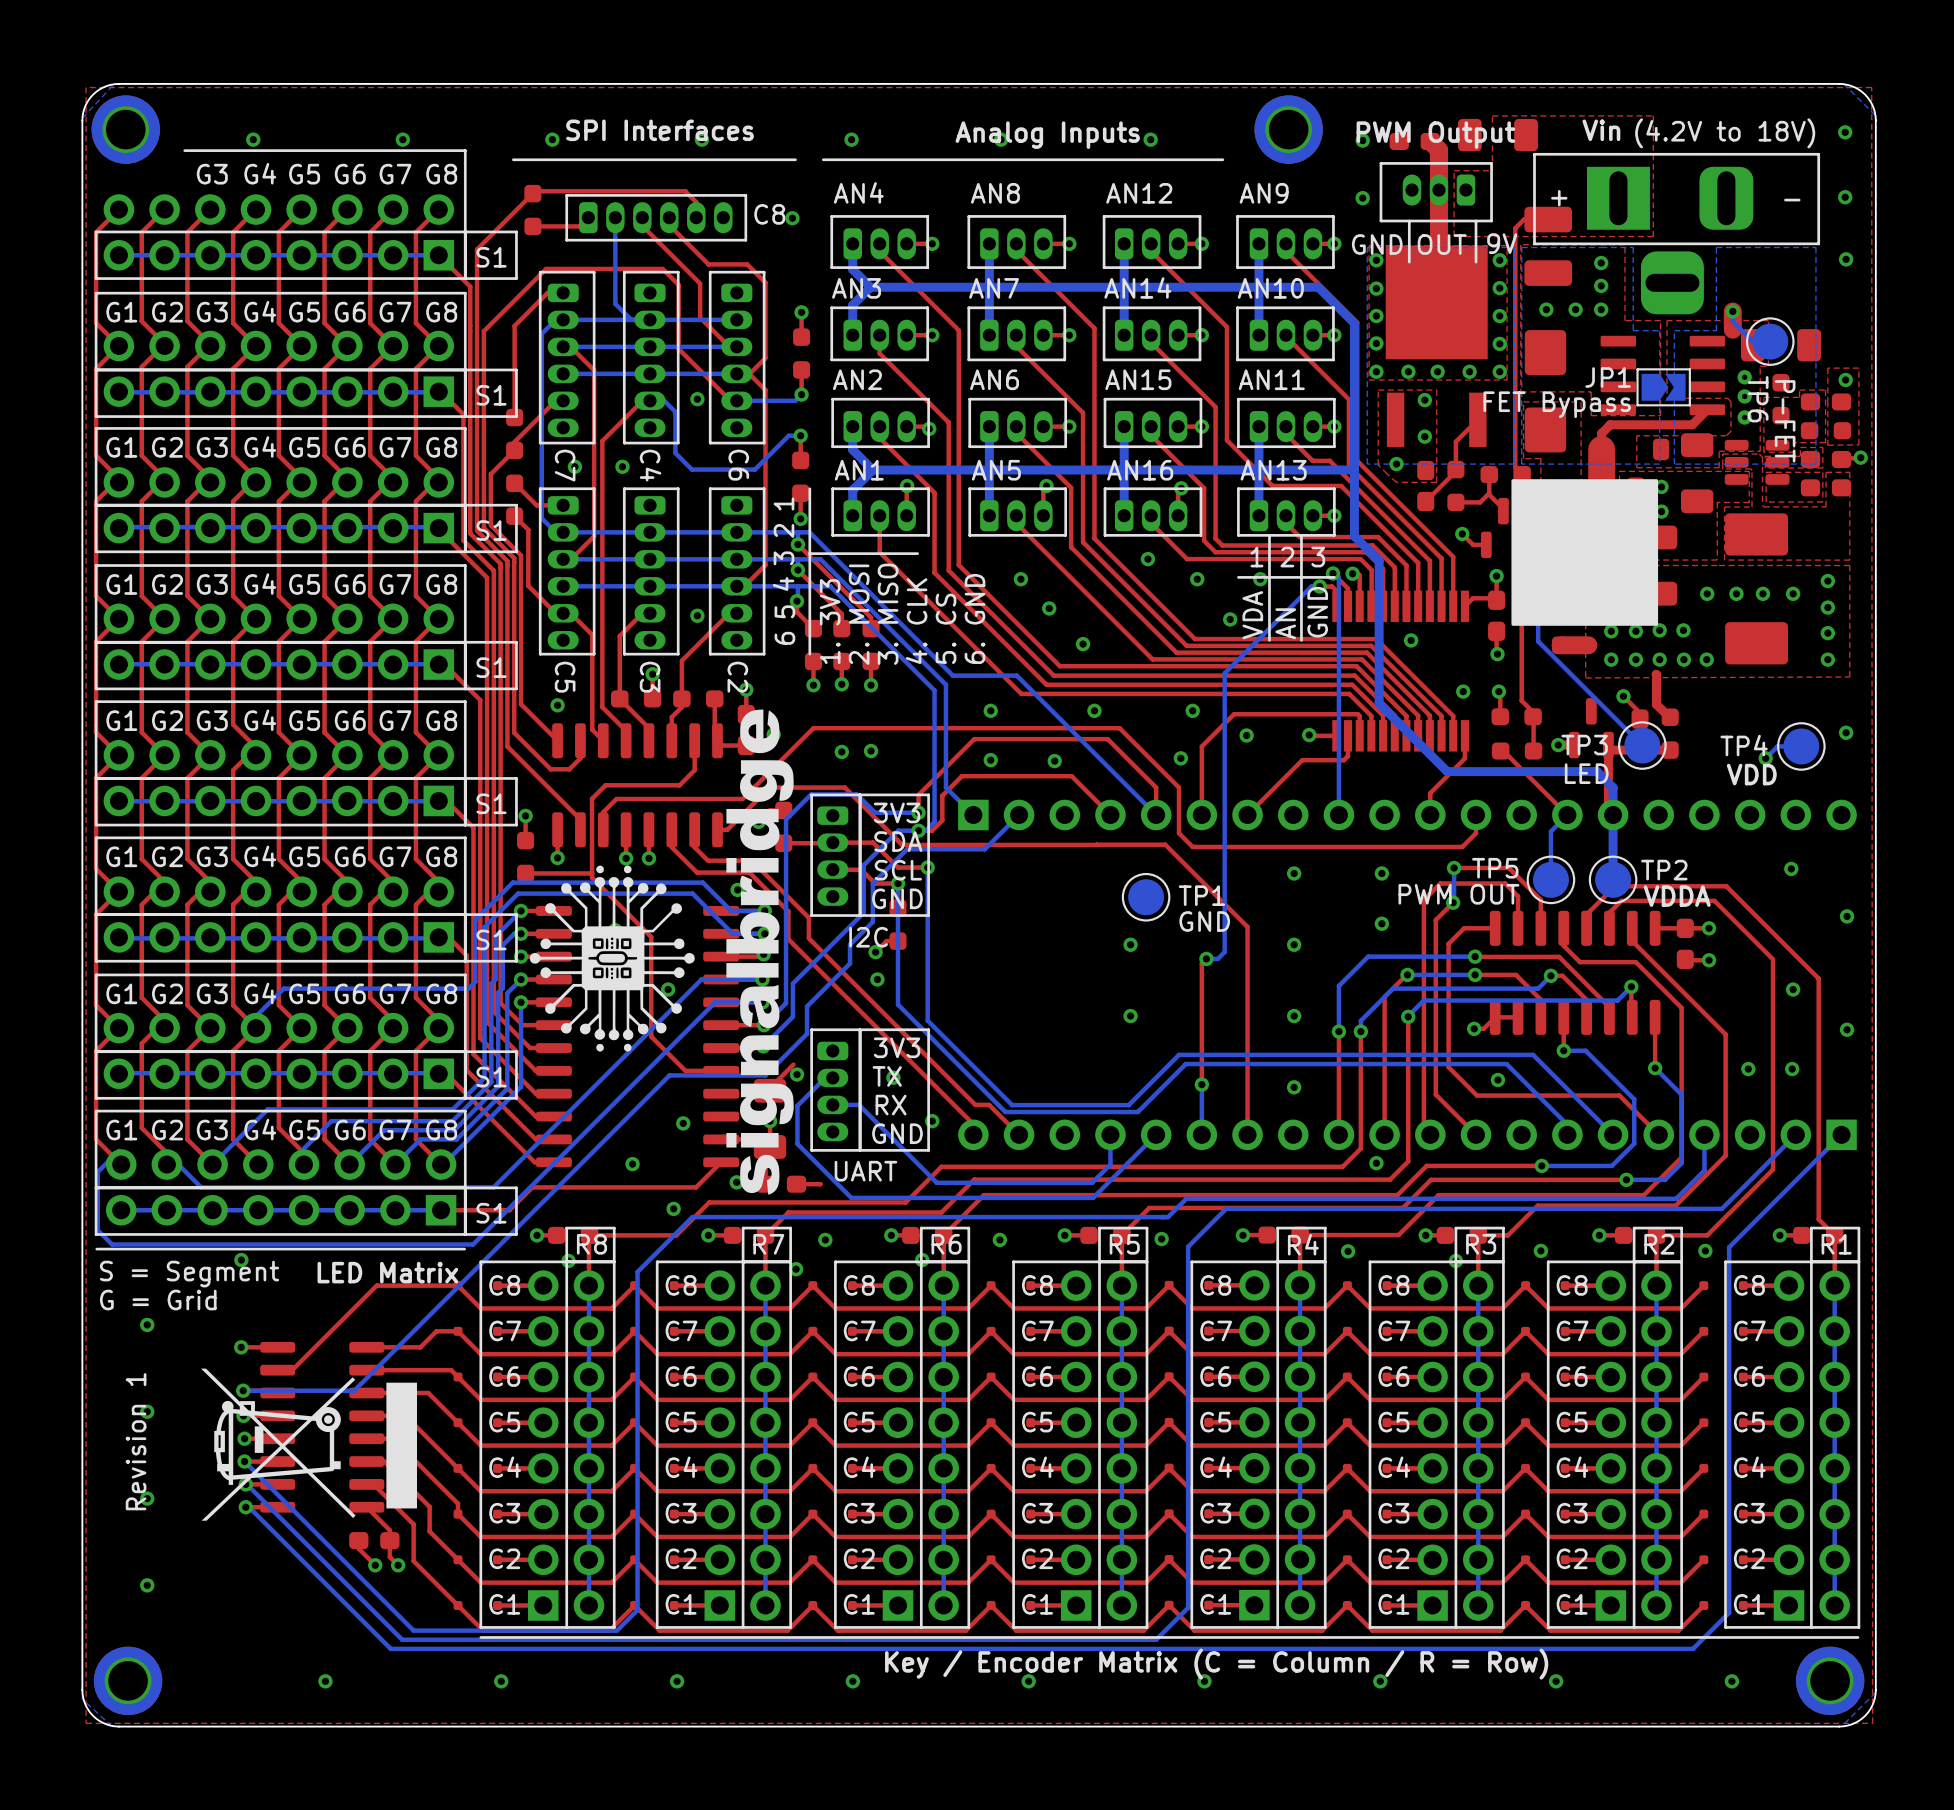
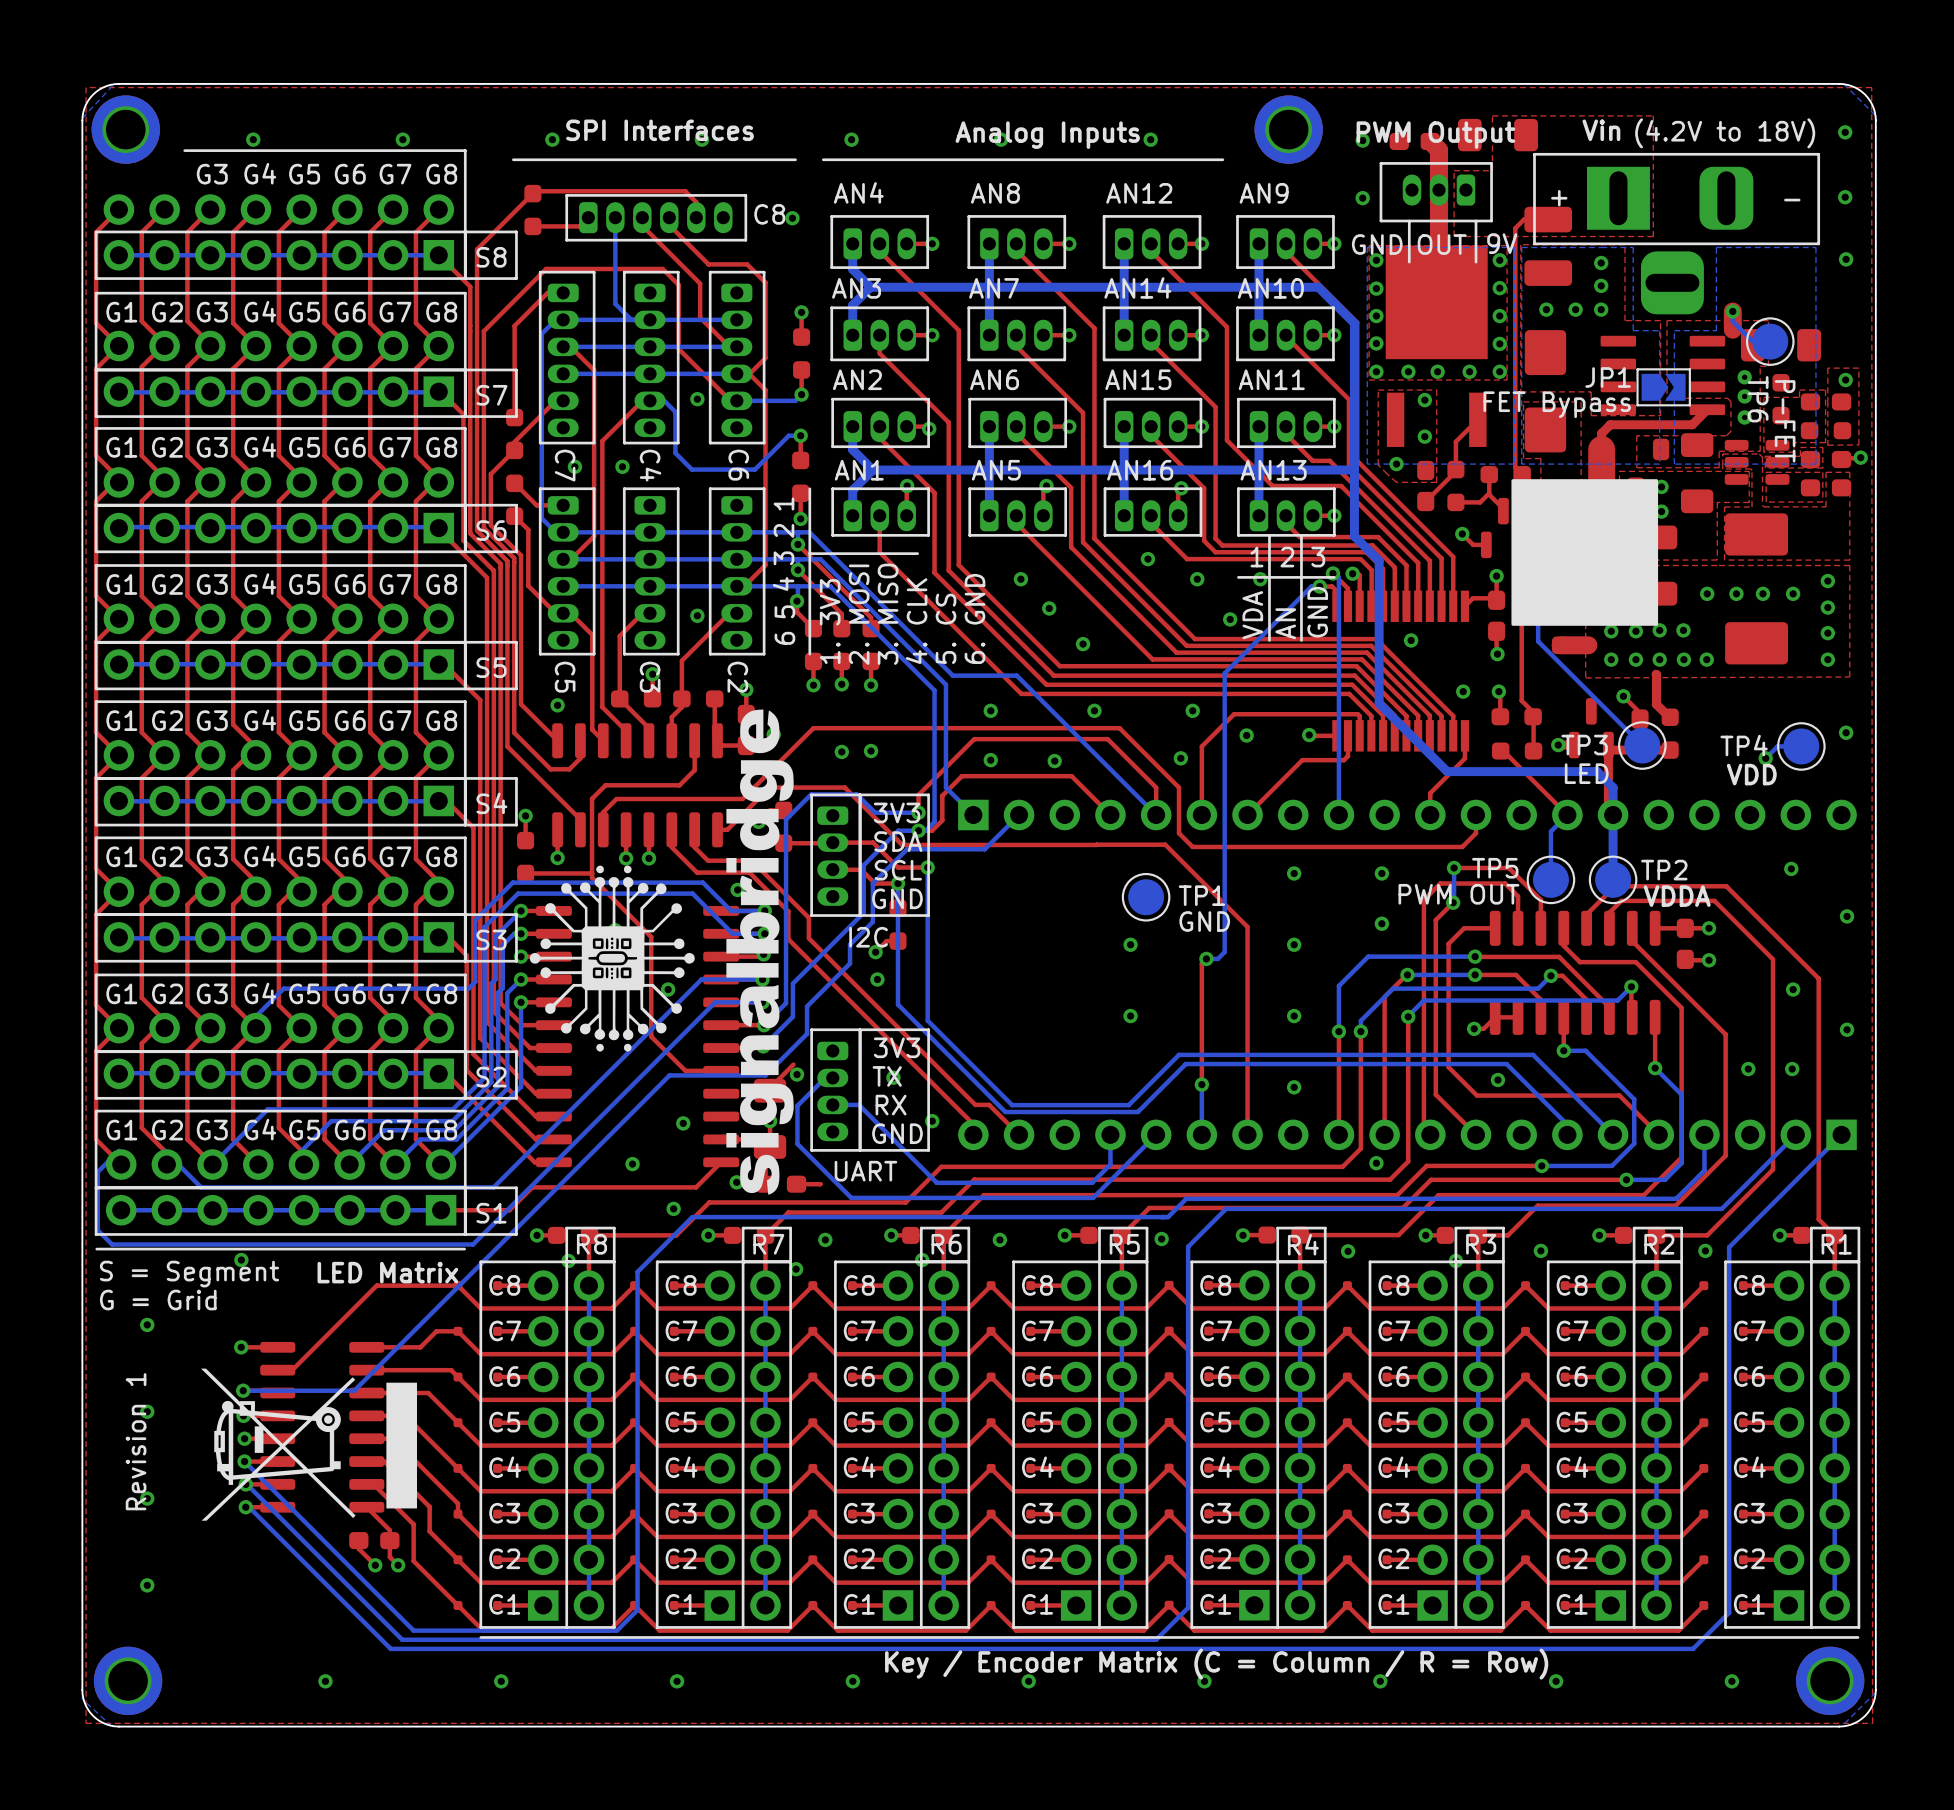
text: S1 (491, 257) -> S8 (491, 257)
text: S1 (491, 395) -> S7 (491, 395)
text: S1 (491, 530) -> S6 (491, 530)
text: S1 (491, 667) -> S5 (491, 667)
text: S1 (491, 803) -> S4 (491, 803)
text: S1 (491, 939) -> S3 (491, 939)
text: S1 (491, 1077) -> S2 (491, 1077)

